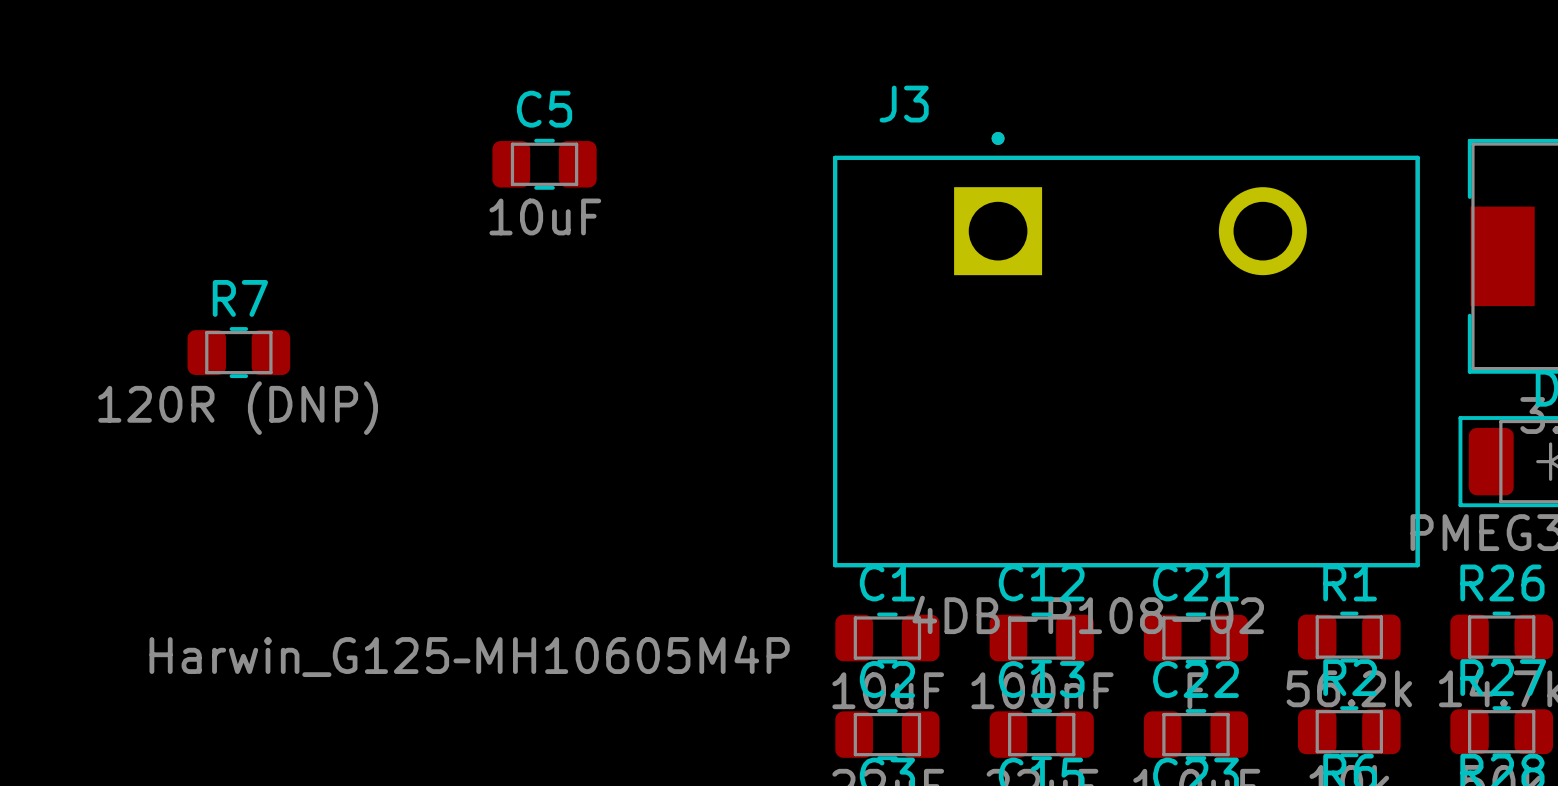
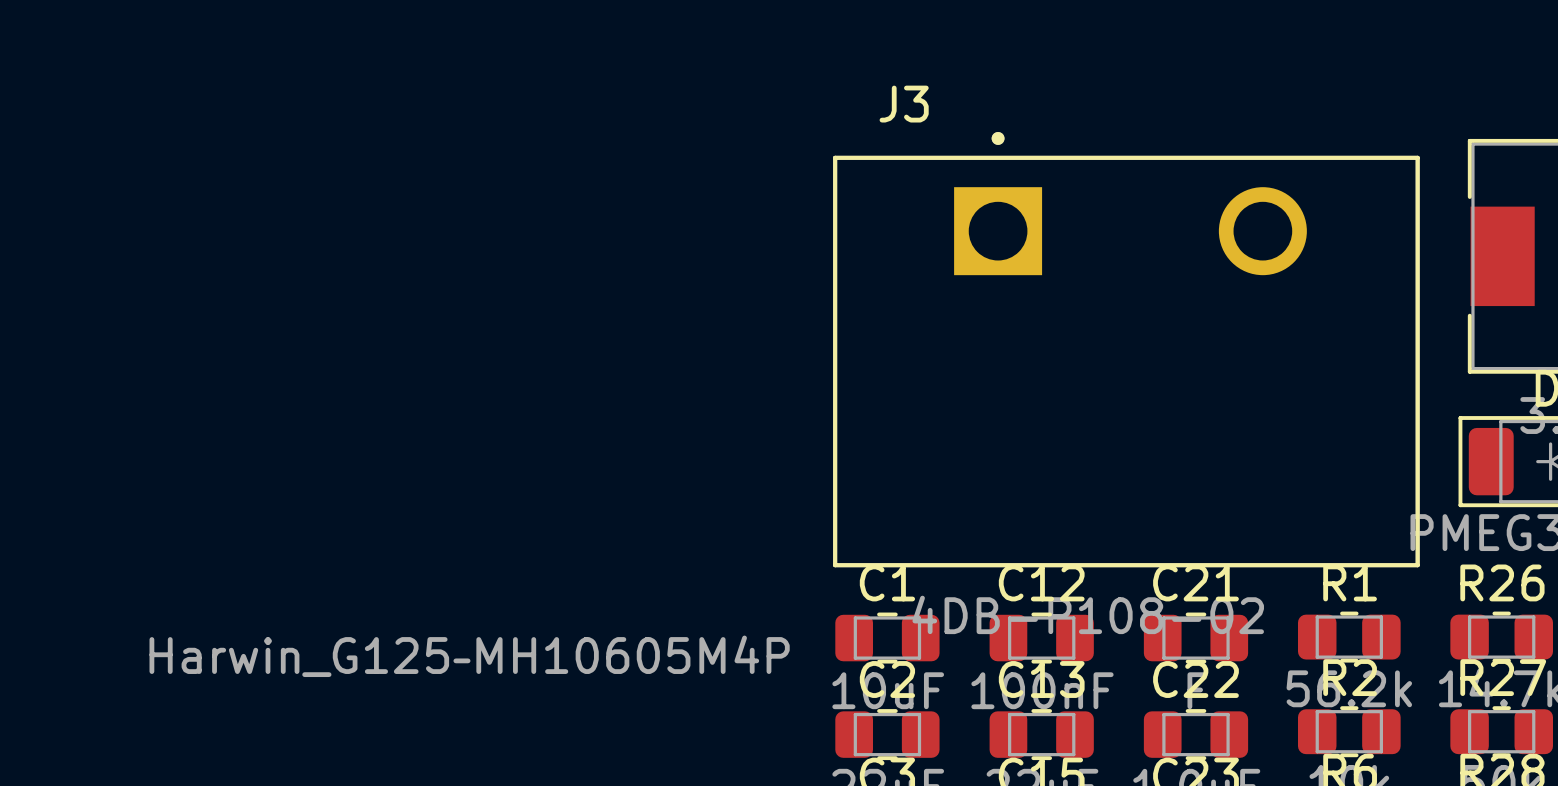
C5: 10uF (544, 164) -> none
R7: 120R (DNP) (238, 352) -> none

